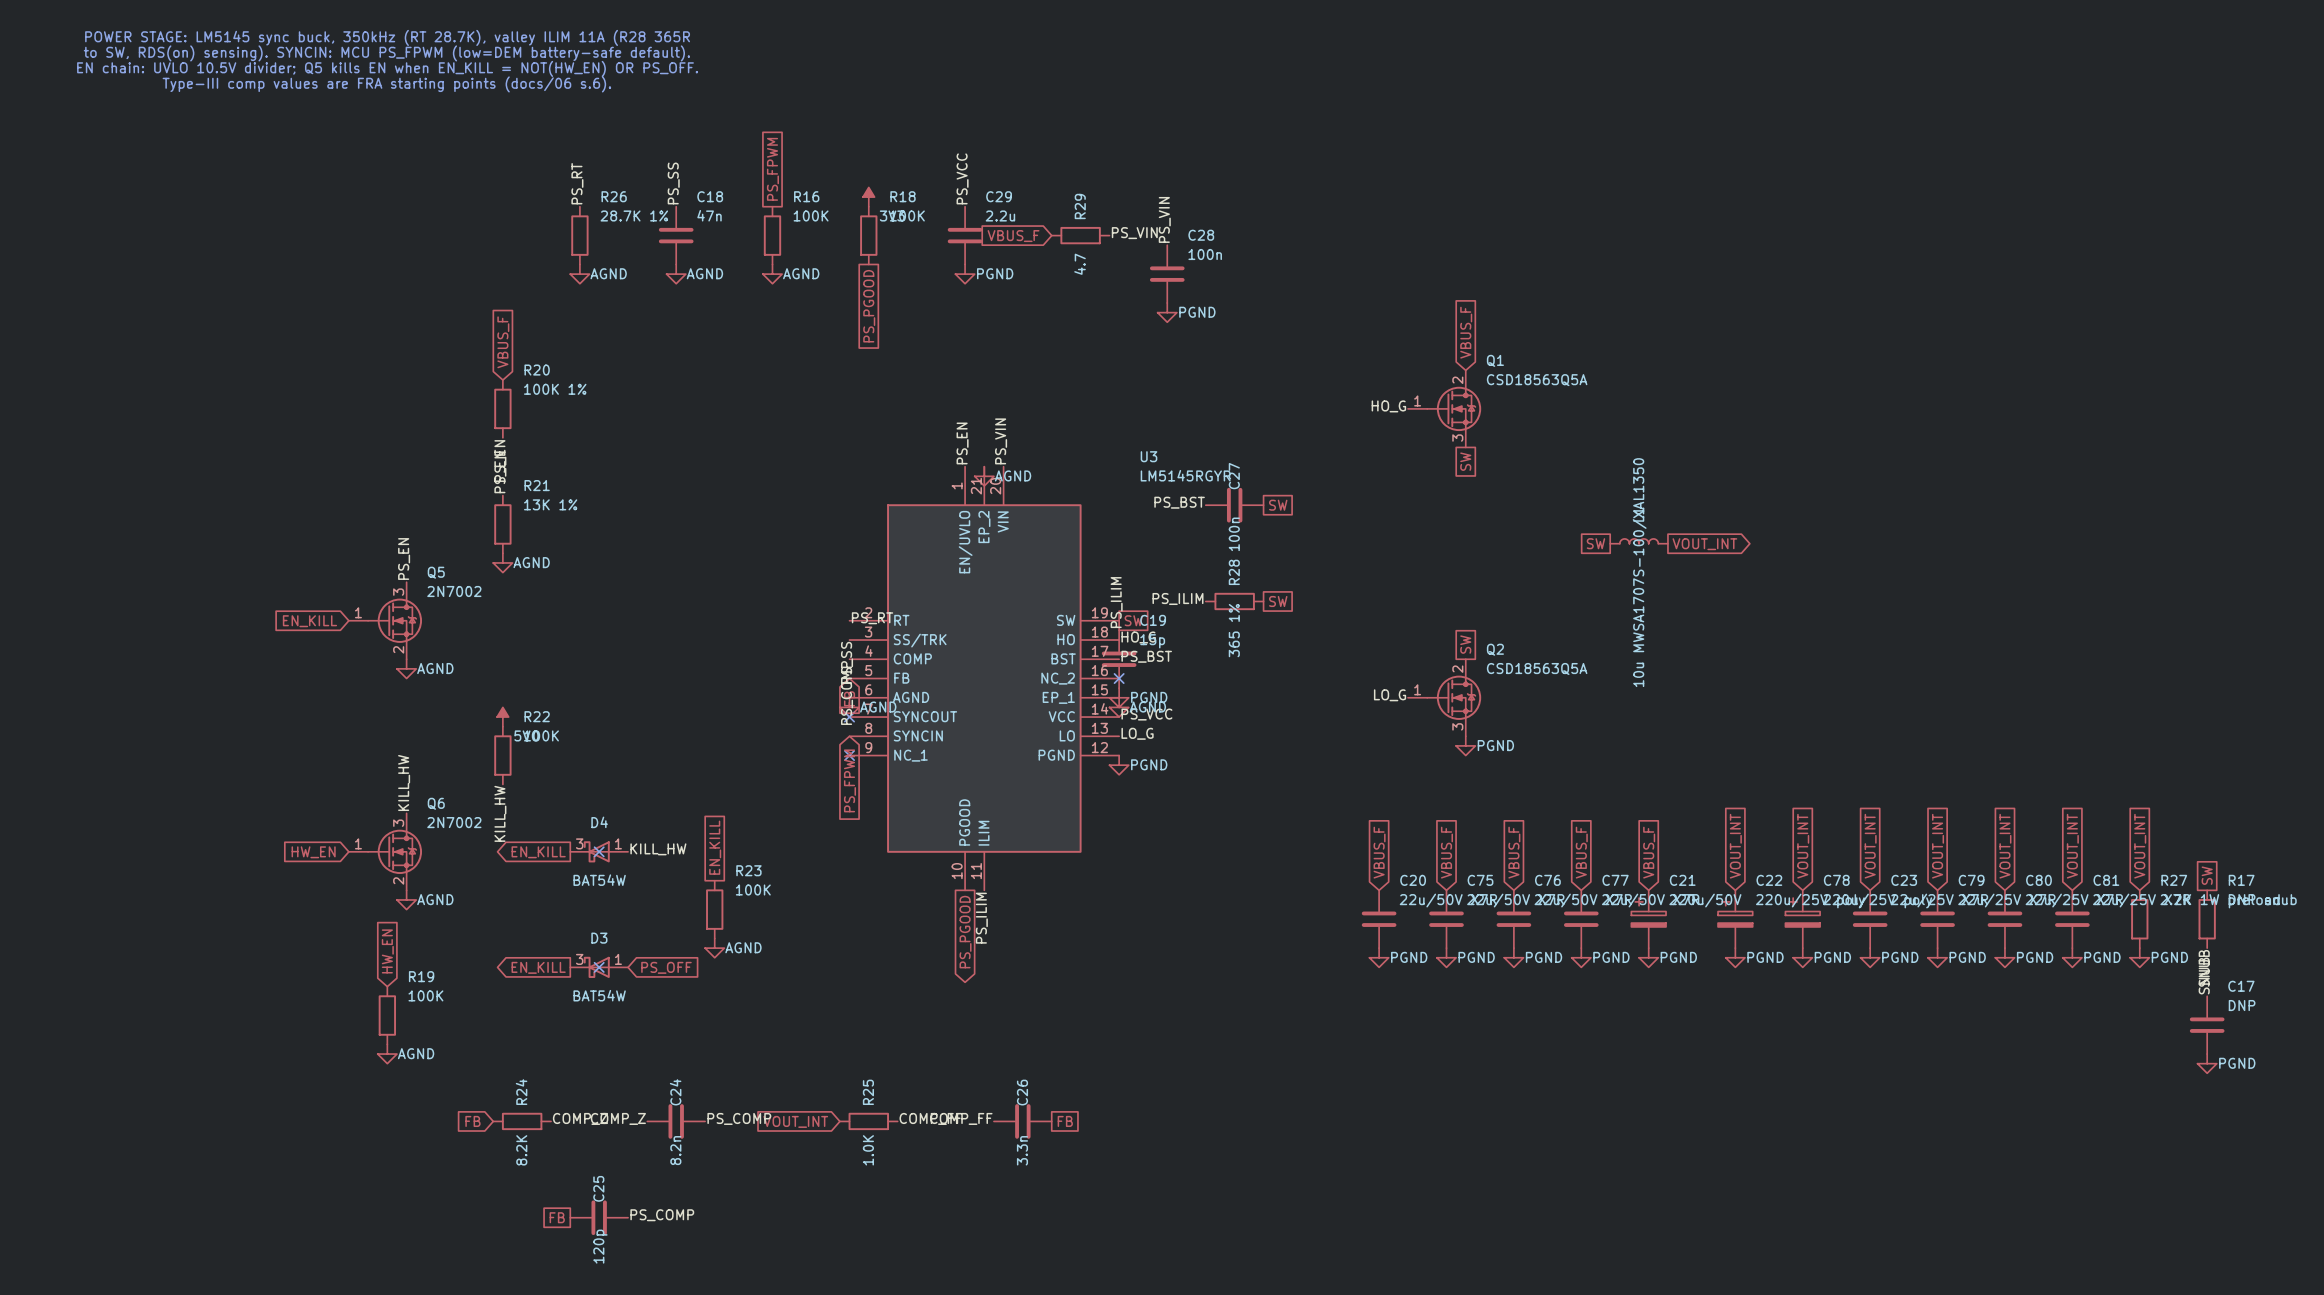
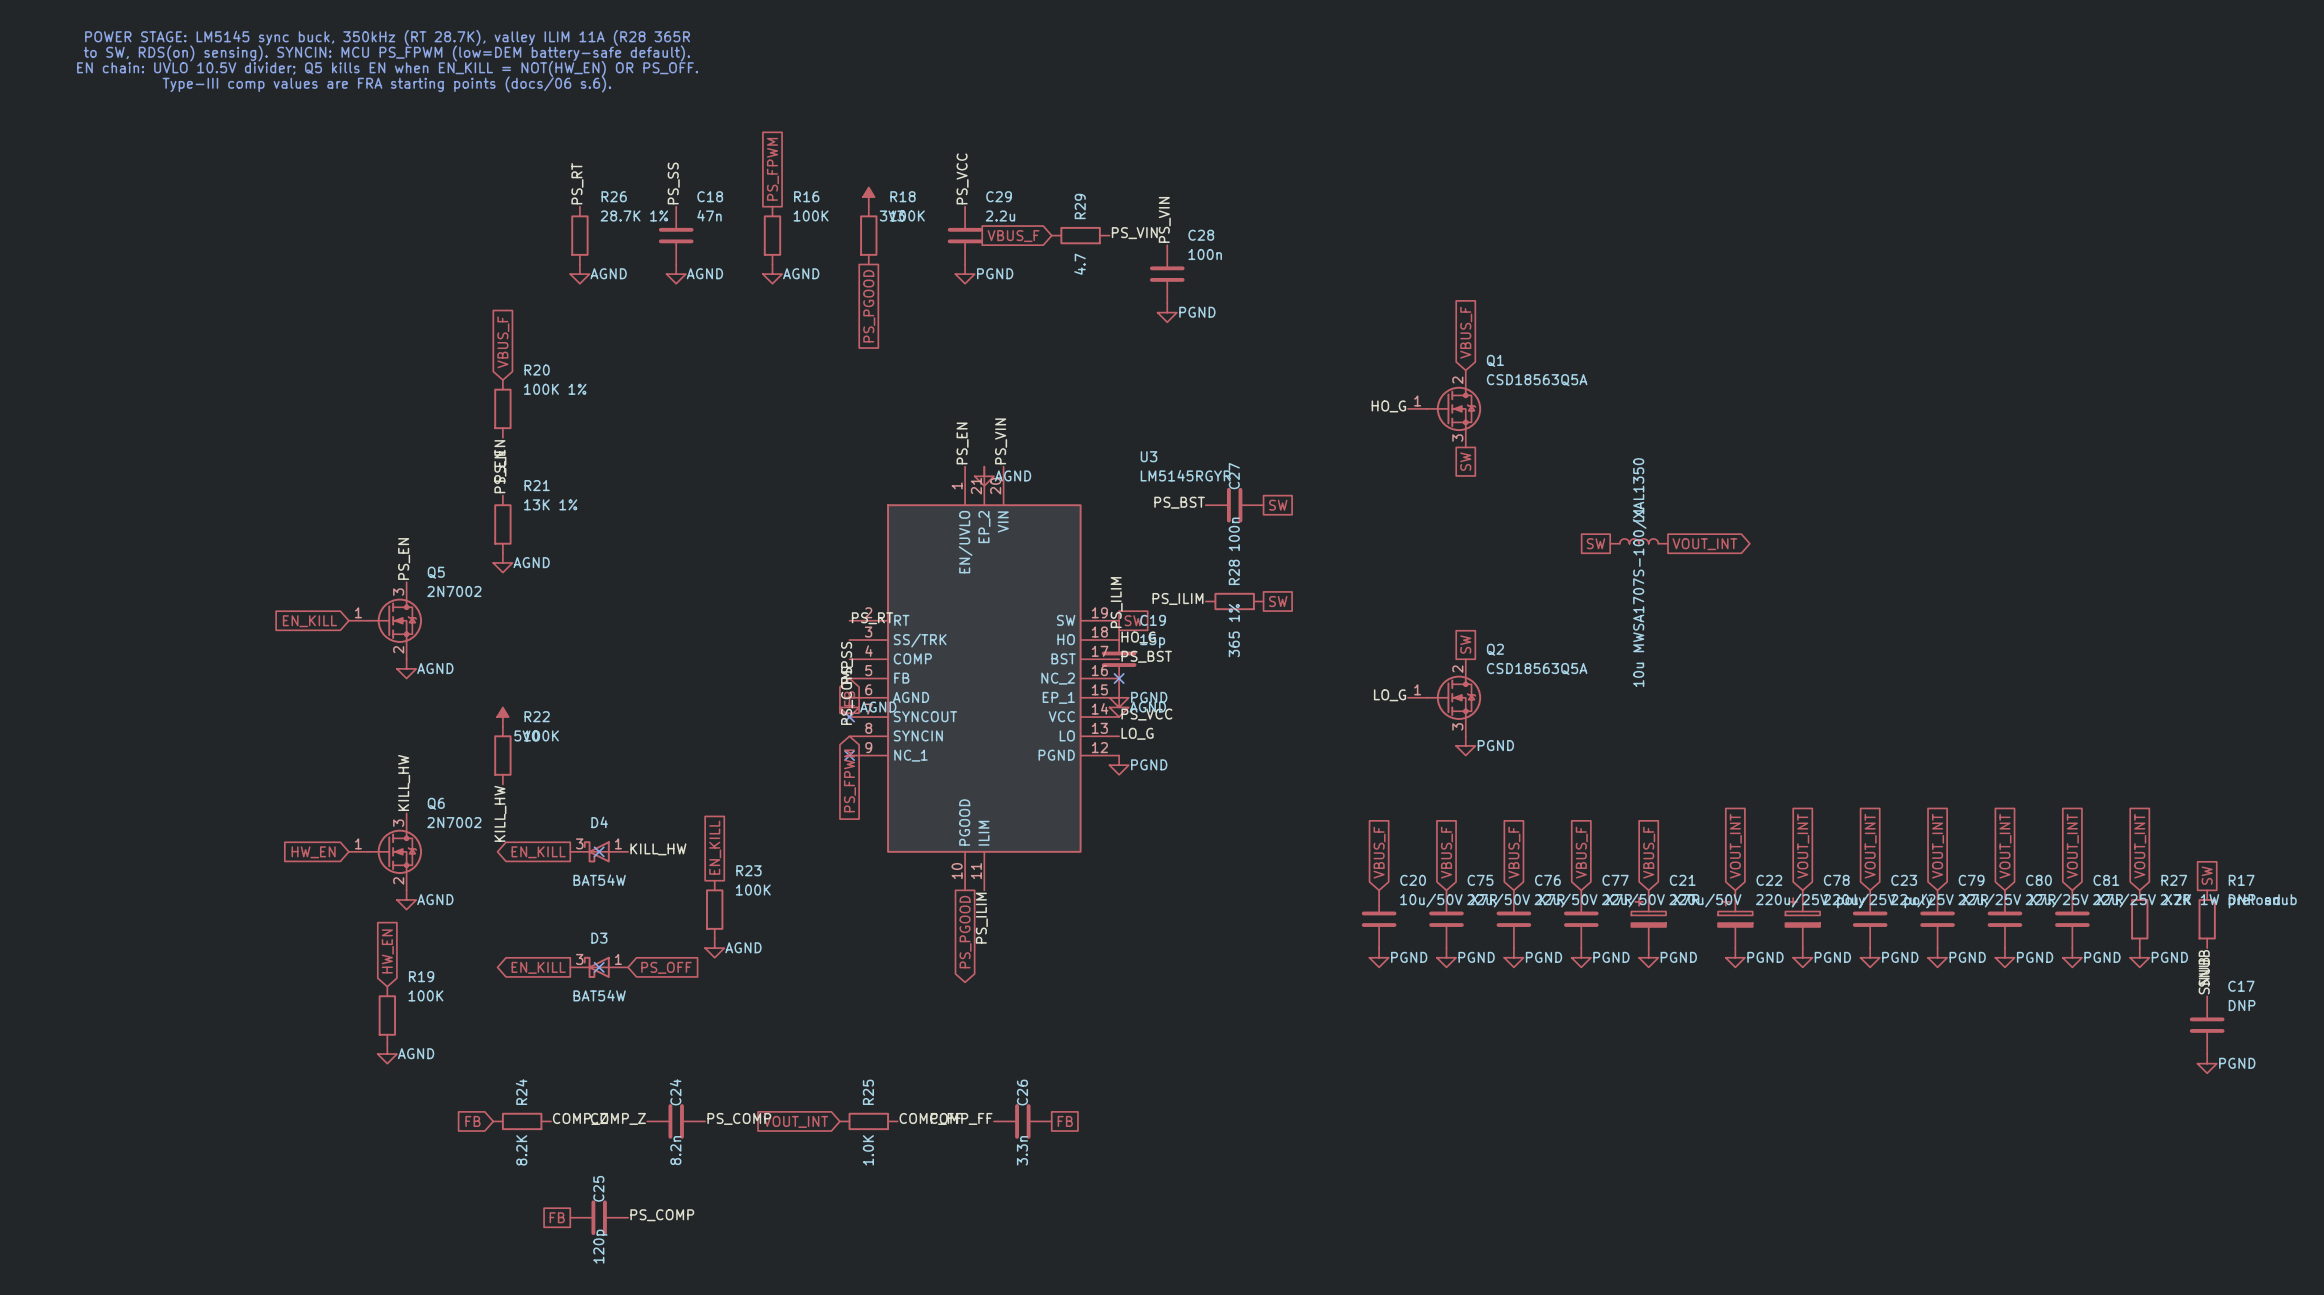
C20 value: 22u/50V X7R (1448, 900) -> 10u/50V X7R (1448, 900)

